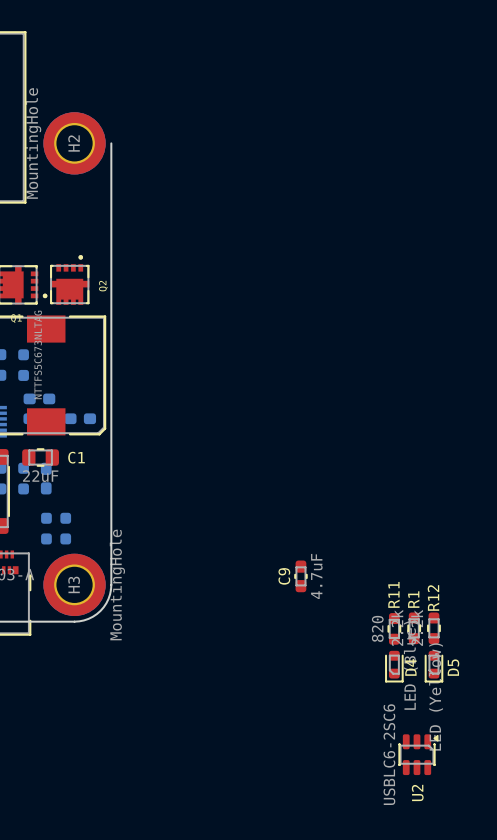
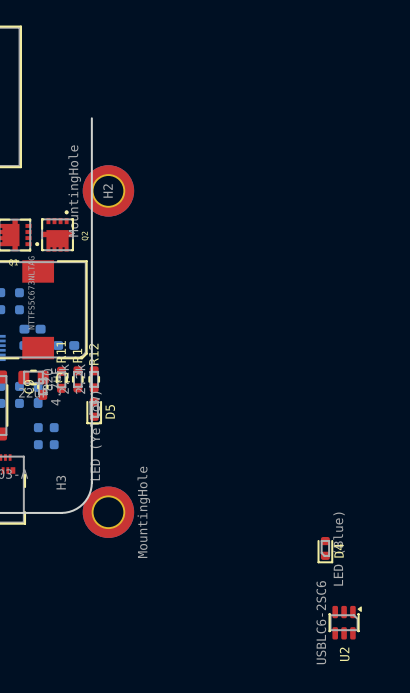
H2 position: (74, 143) -> (108, 190)
C9 position: (300, 576) -> (42, 386)
H3 position: (74, 584) -> (108, 512)
R11 position: (394, 628) -> (61, 379)
R1 position: (414, 628) -> (77, 379)
R12 position: (433, 628) -> (94, 379)
D5 position: (433, 666) -> (94, 410)

